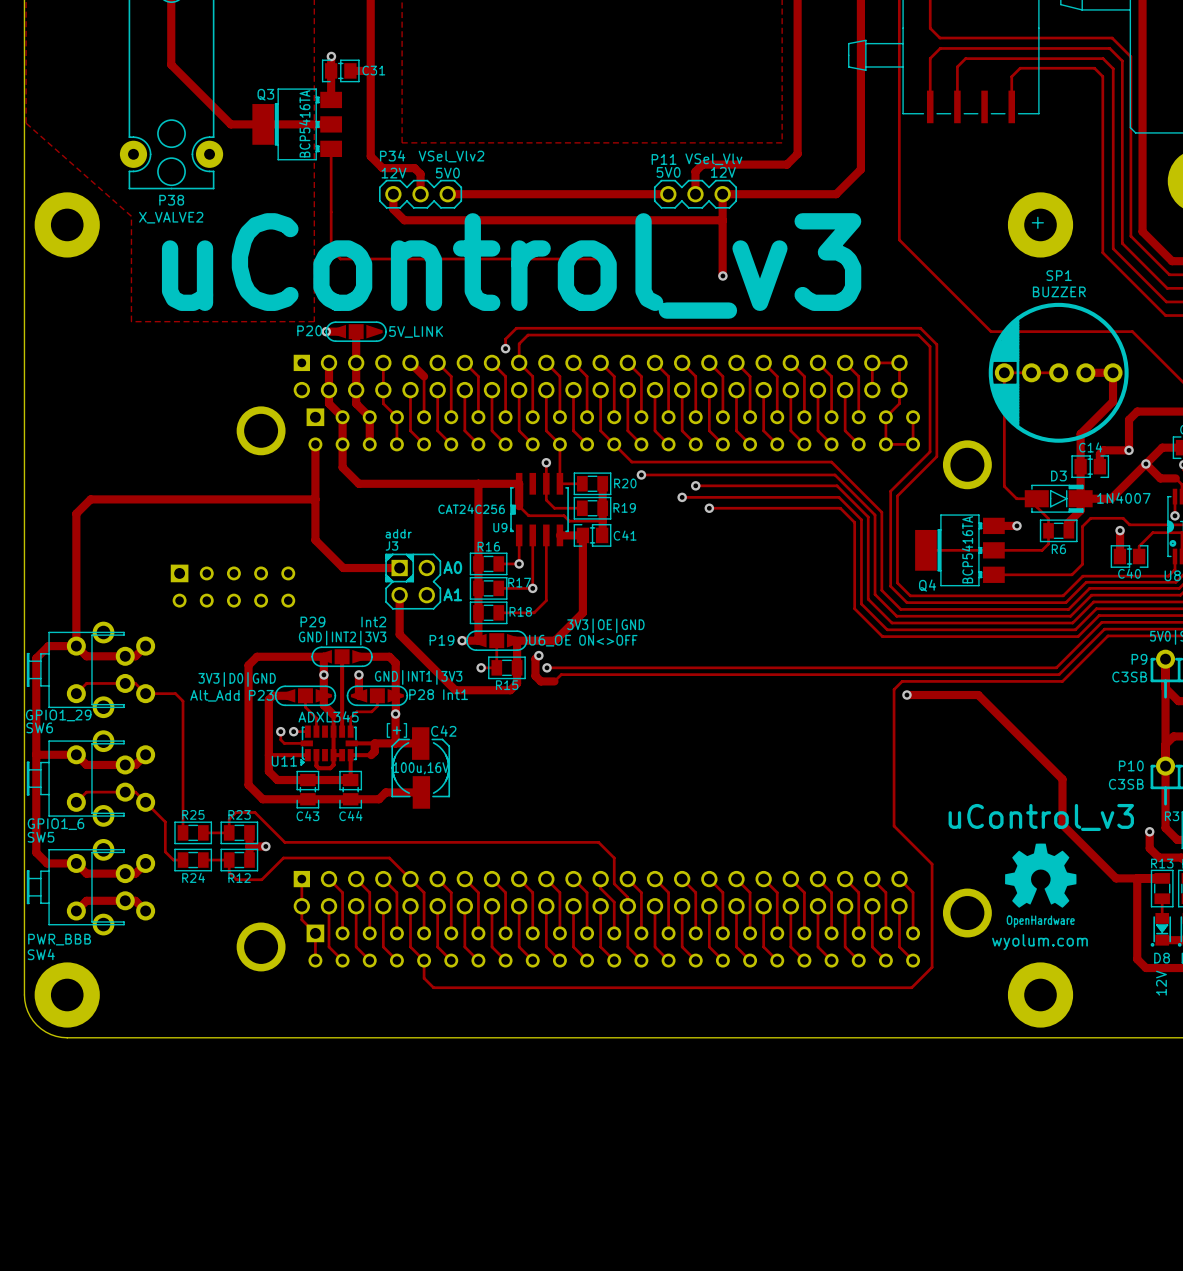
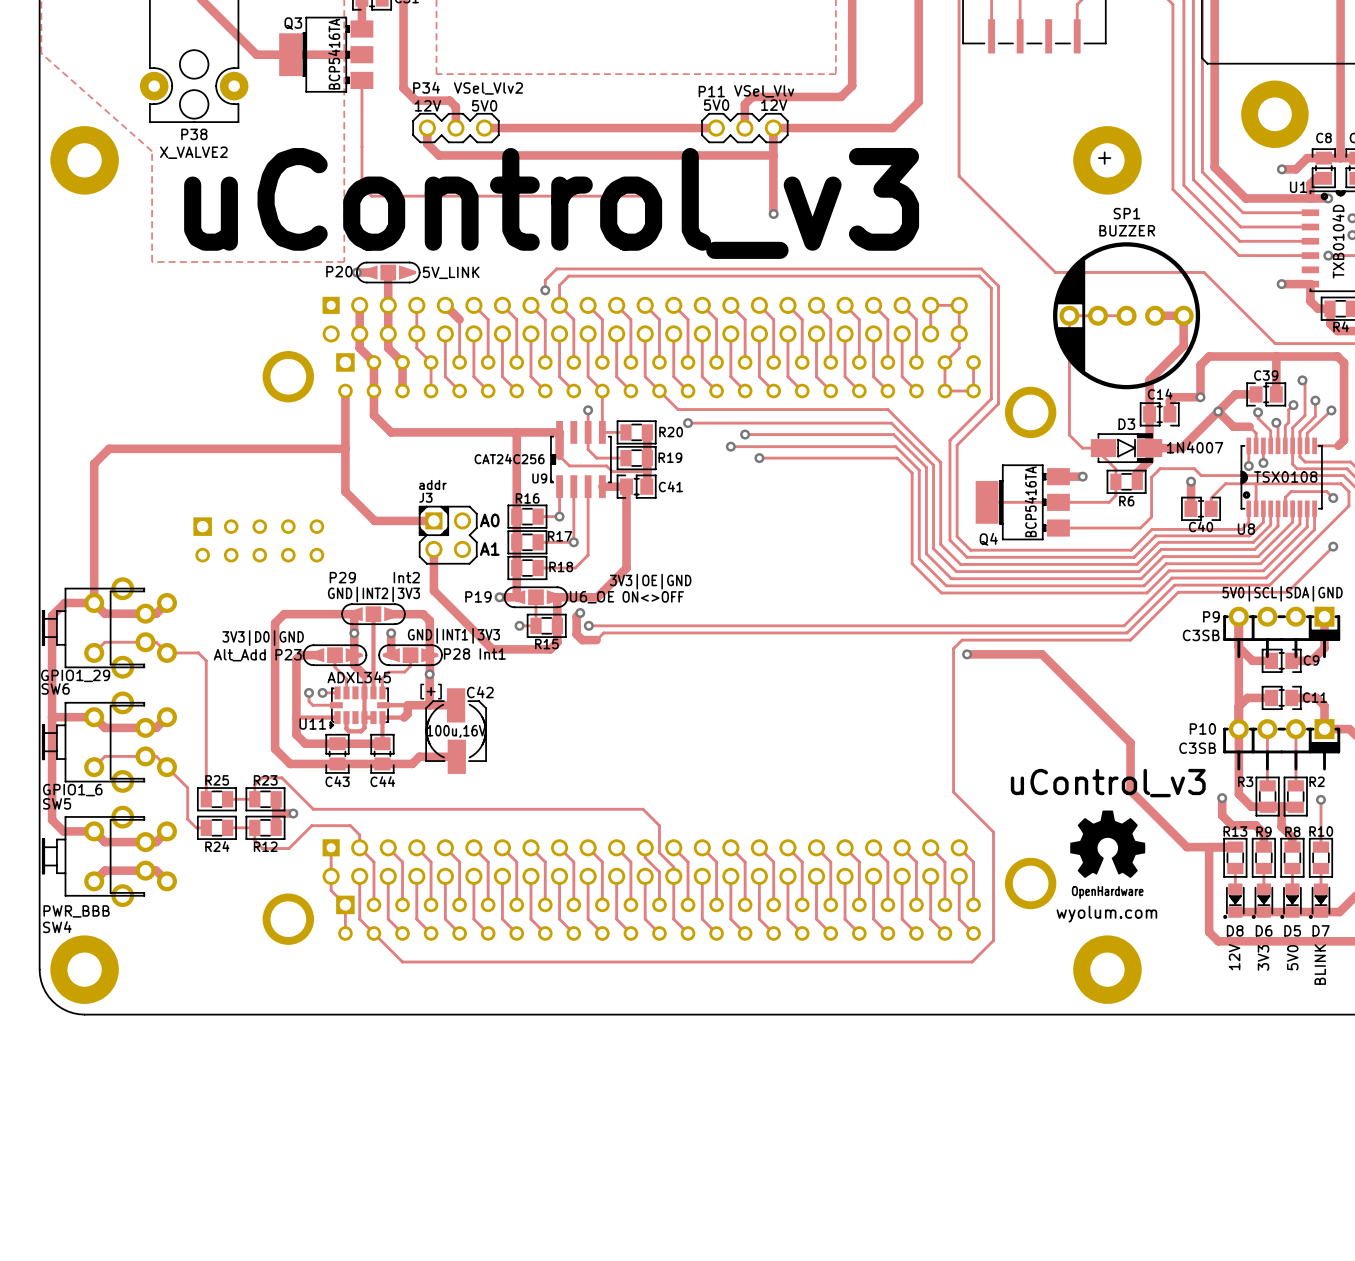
track: (320, 858) (389, 858) (410, 879) -> (350, 825) (359, 834) (359, 847)
track: (424, 960) (424, 978) (433, 987) -> (373, 933) (402, 962) (469, 962)

